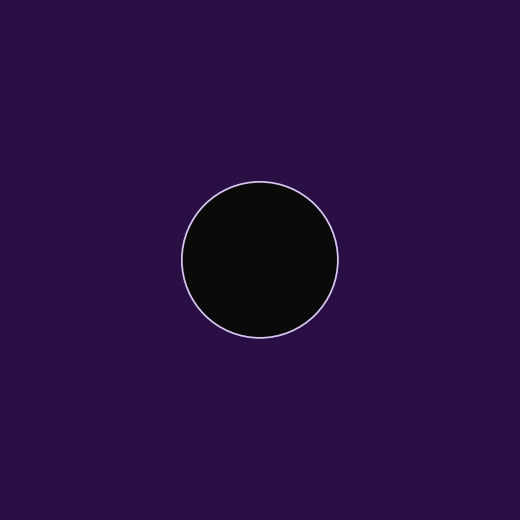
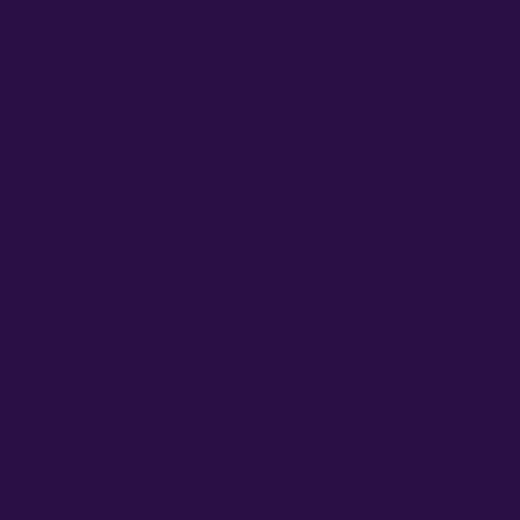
part: (259, 259) -> none

